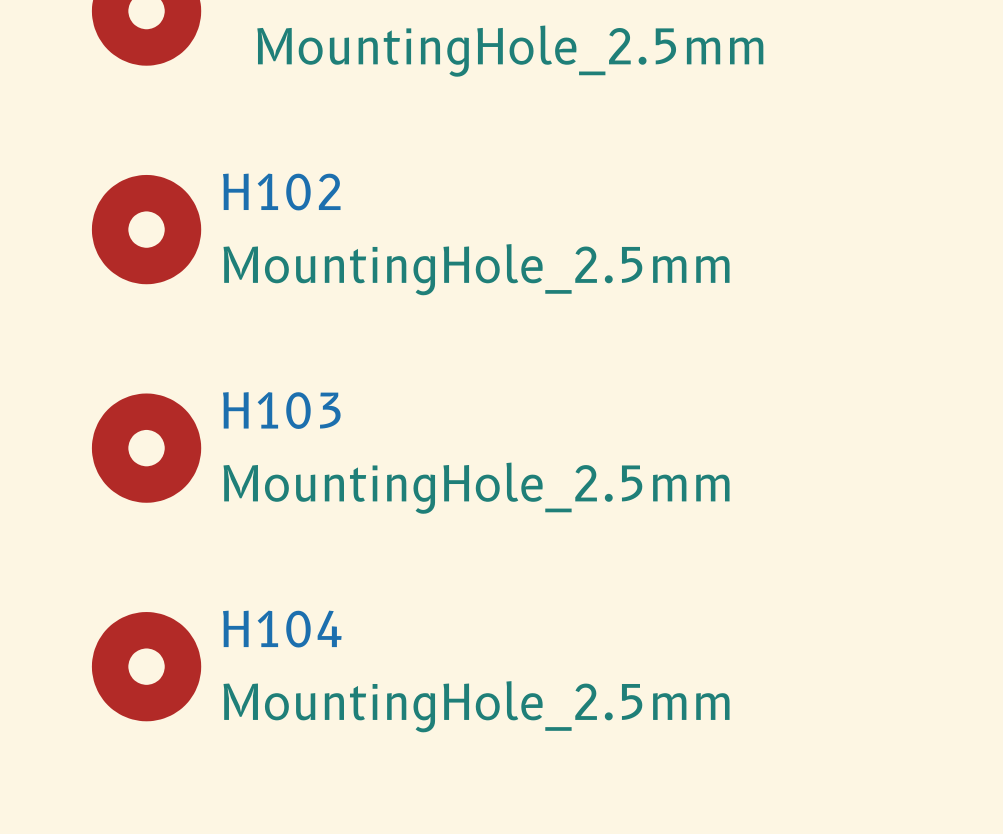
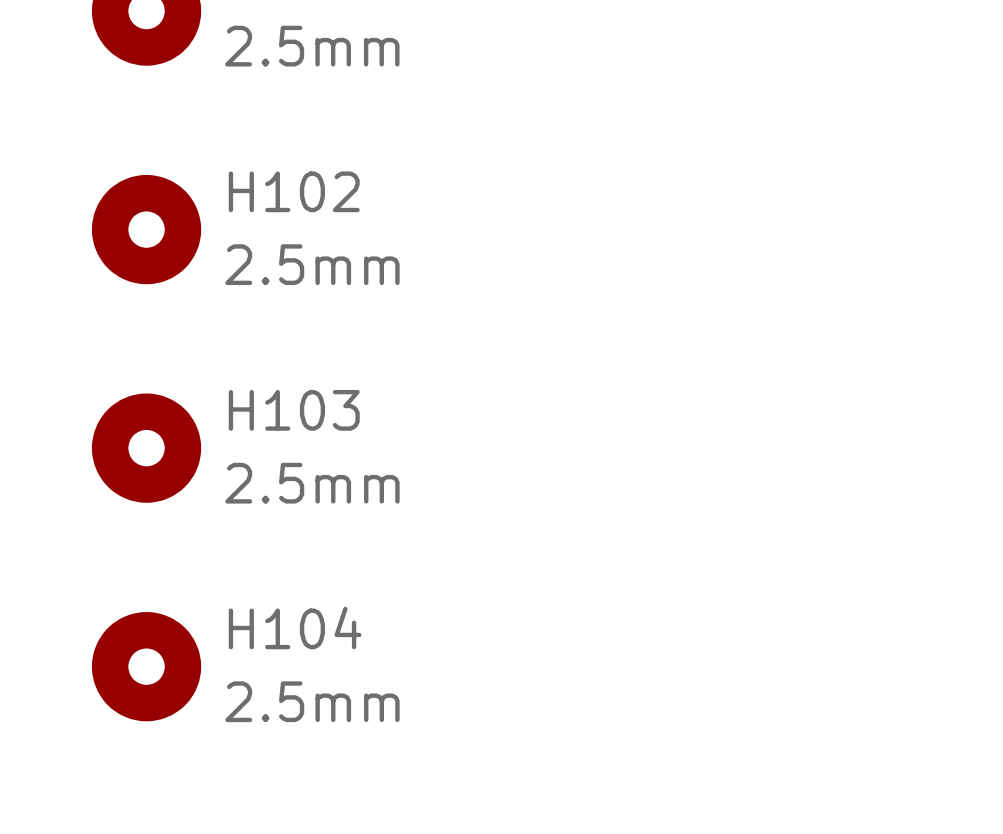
part value: MountingHole_2.5mm (510, 51) -> 2.5mm (312, 46)
H102 value: MountingHole_2.5mm (476, 269) -> 2.5mm (312, 264)
H103 value: MountingHole_2.5mm (476, 488) -> 2.5mm (312, 483)
H104 value: MountingHole_2.5mm (476, 706) -> 2.5mm (312, 701)

